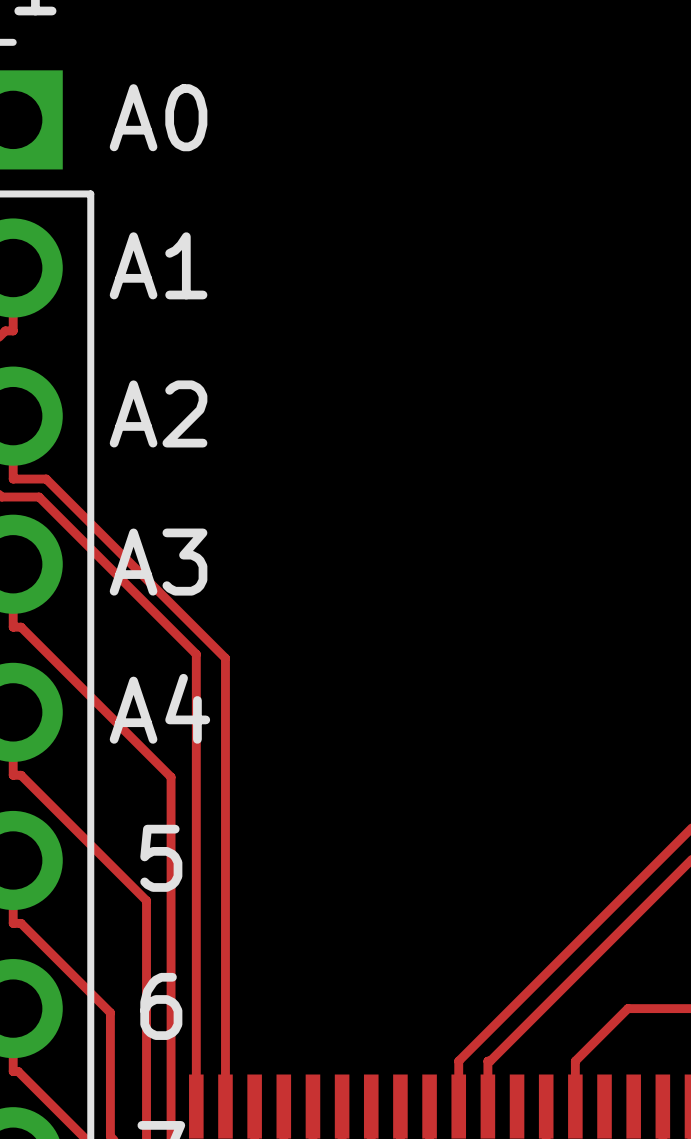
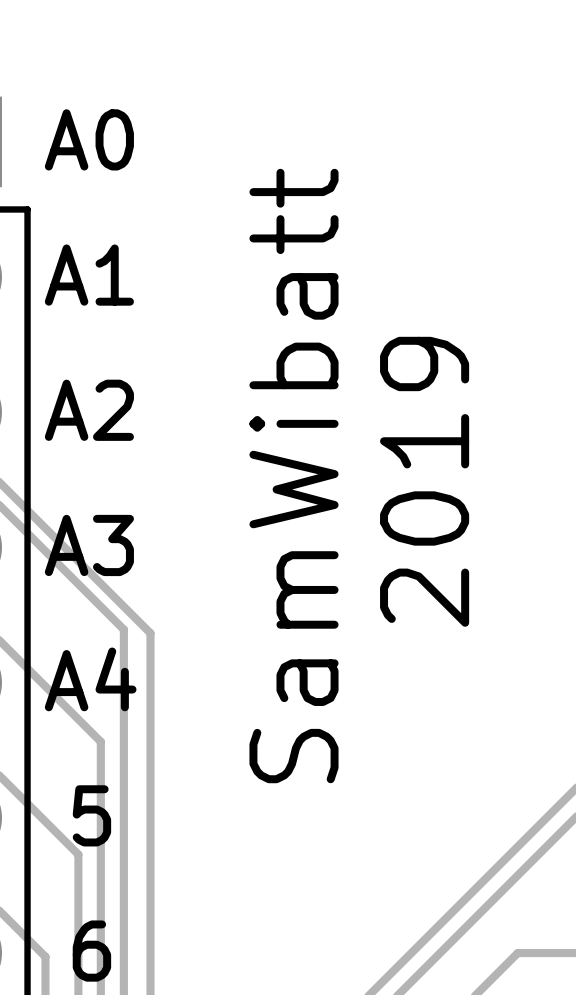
text: none -> SamWibatt (293, 476)
text: none -> 2019 (424, 481)

